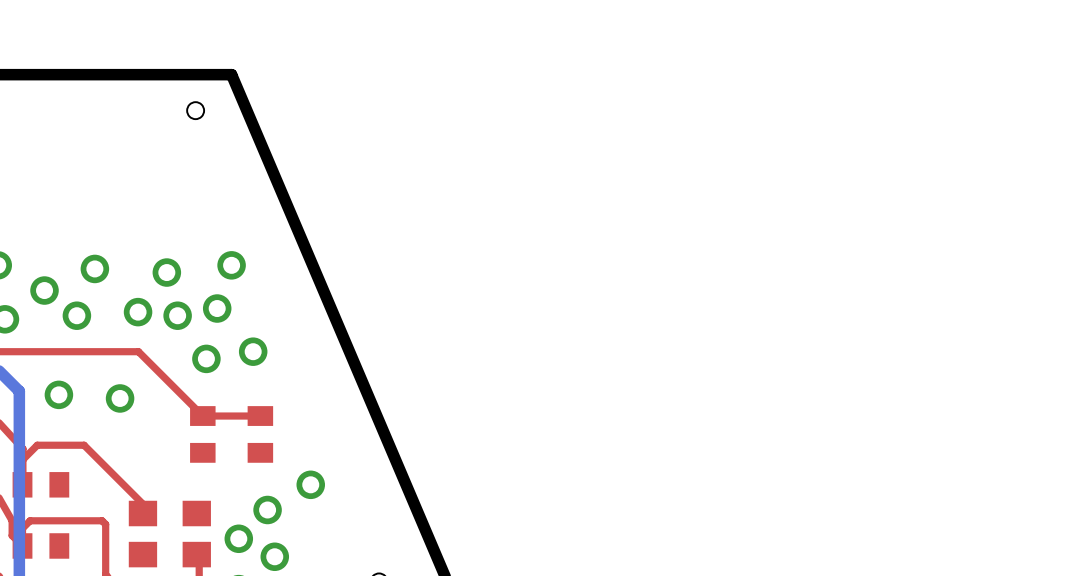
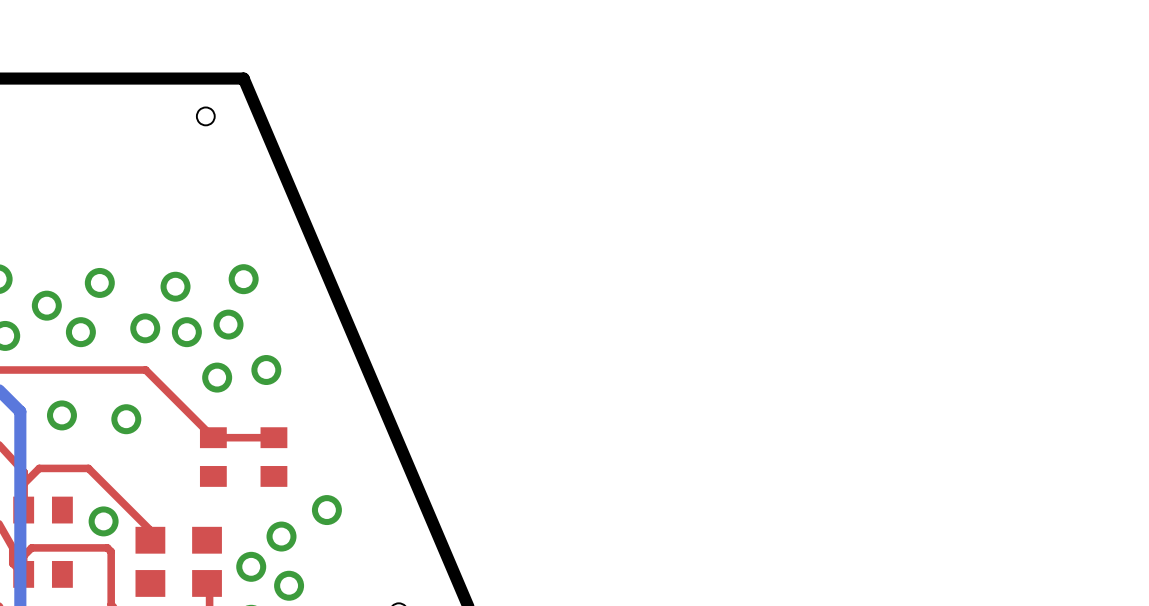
via: none -> (103, 521)

